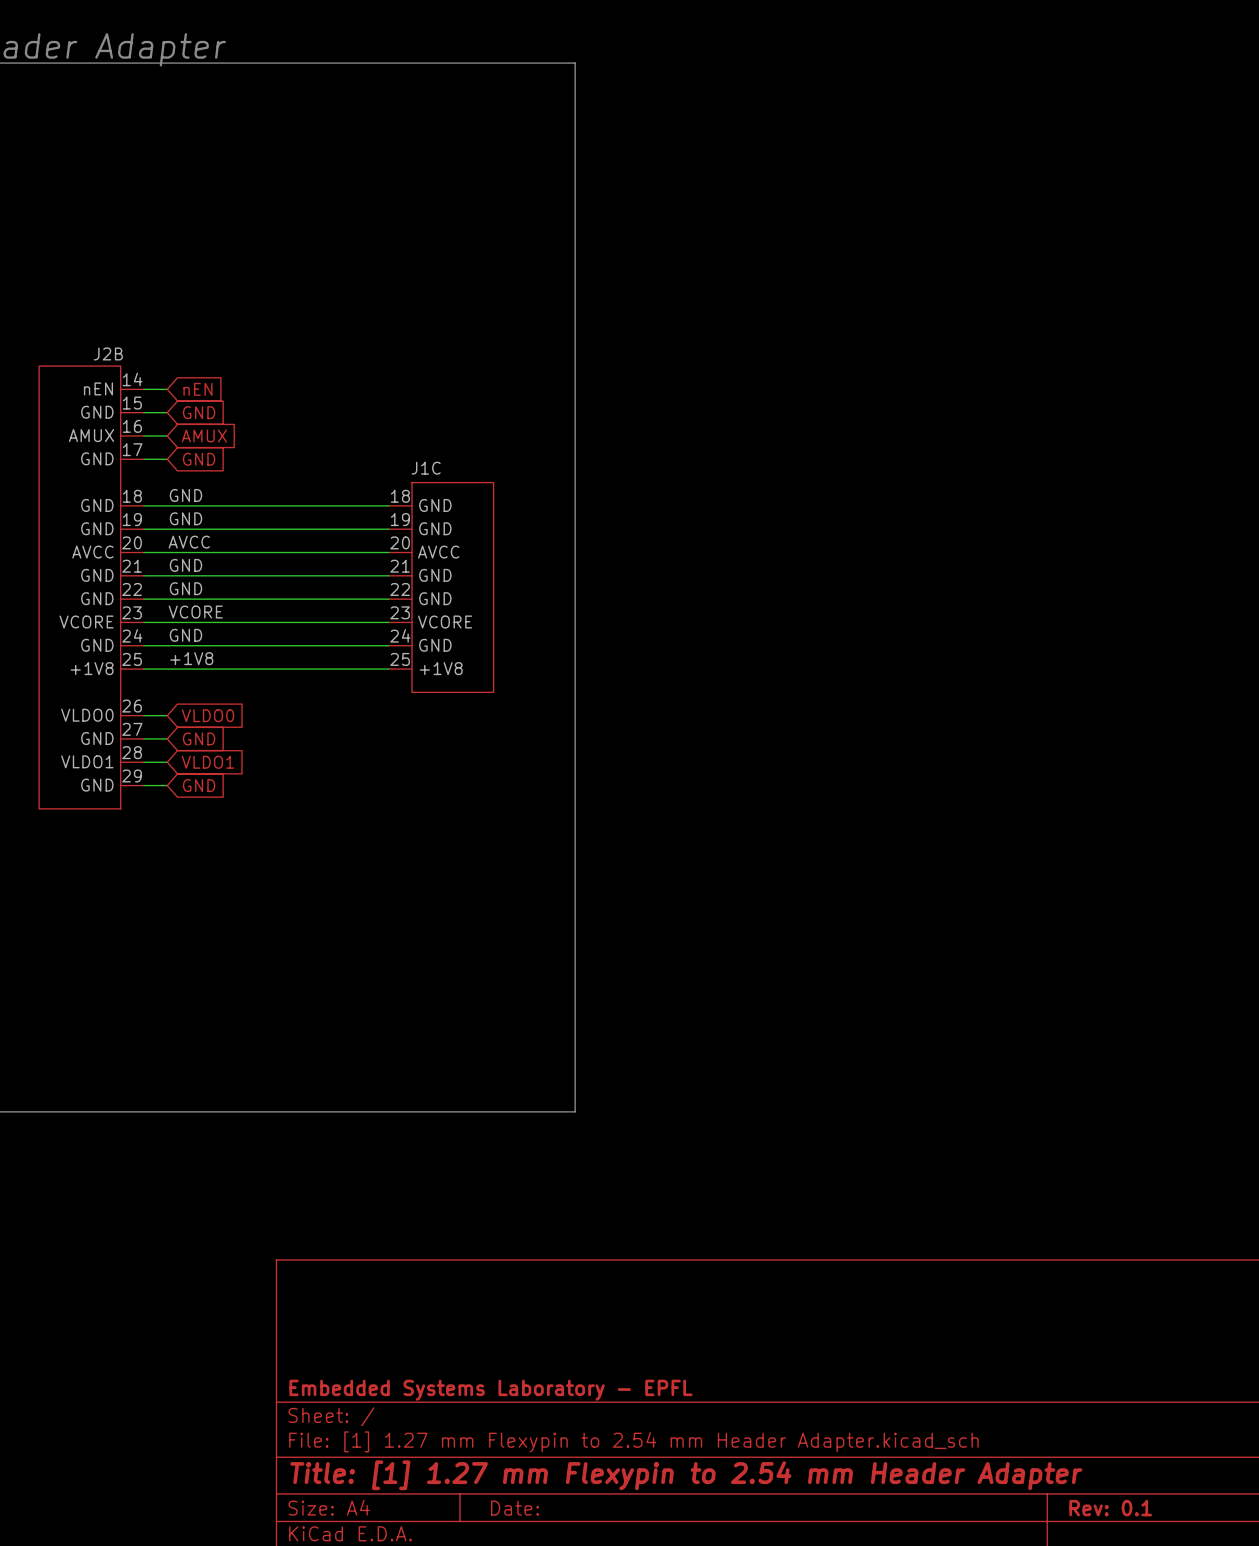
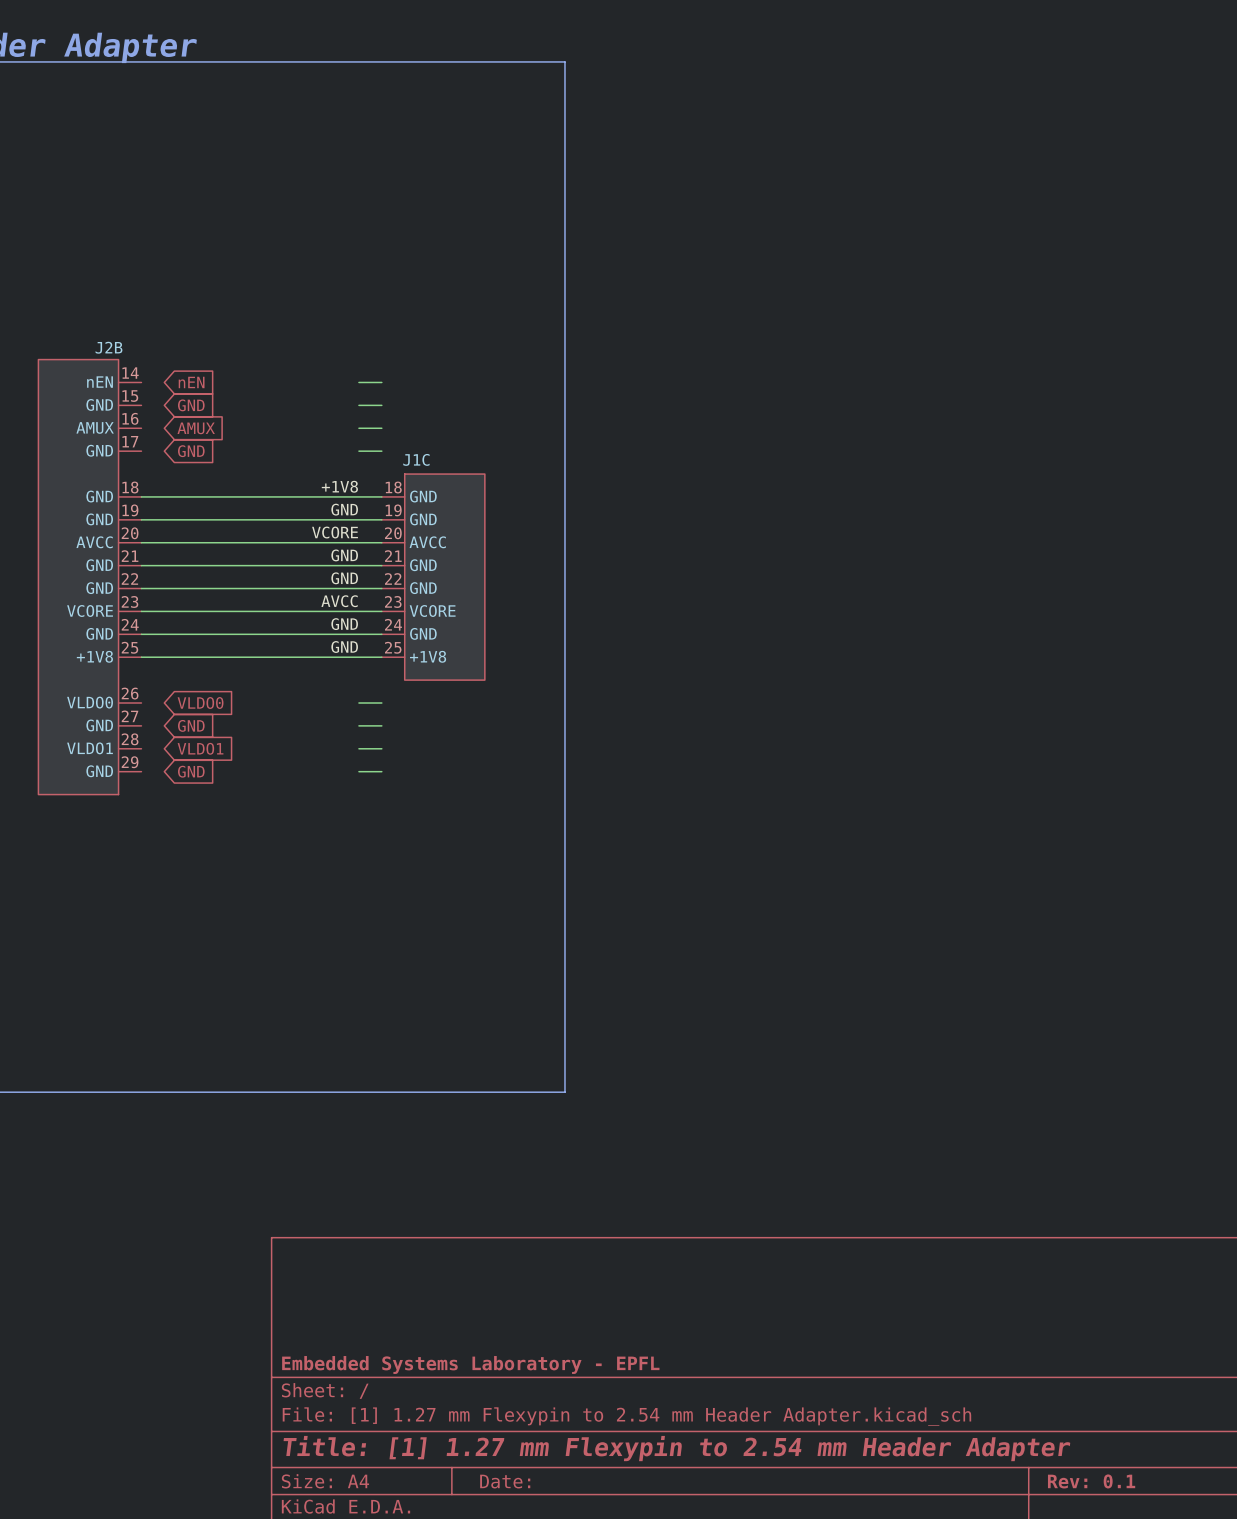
wire: (143, 389) (167, 389) -> (358, 382) (381, 382)
wire: (143, 412) (167, 412) -> (358, 405) (381, 405)
wire: (143, 435) (167, 435) -> (358, 428) (381, 428)
wire: (143, 459) (167, 459) -> (358, 451) (381, 451)
label: GND (185, 495) -> none
label: none -> +1V8 (339, 486)
label: GND (185, 518) -> none
label: none -> GND (344, 509)
label position: AVCC (189, 542) -> AVCC (339, 601)
label: GND (185, 565) -> none
label: none -> GND (344, 555)
label: GND (185, 588) -> none
label: none -> GND (344, 578)
label position: VCORE (195, 612) -> VCORE (335, 532)
label: GND (185, 635) -> none
label: none -> GND (344, 624)
label: +1V8 (191, 658) -> none
label: none -> GND (344, 647)
wire: (143, 715) (167, 715) -> (358, 703) (381, 703)
wire: (143, 738) (167, 738) -> (358, 725) (381, 725)
wire: (143, 762) (167, 762) -> (358, 748) (381, 748)
wire: (143, 785) (167, 785) -> (358, 771) (381, 771)

